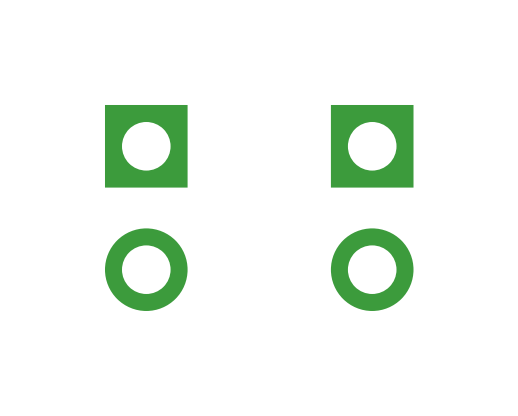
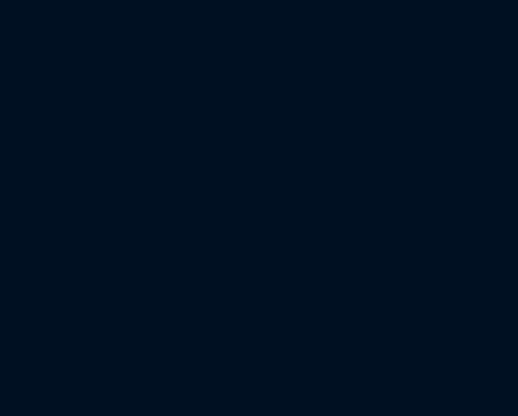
part: (146, 207) -> none
part: (372, 207) -> none

